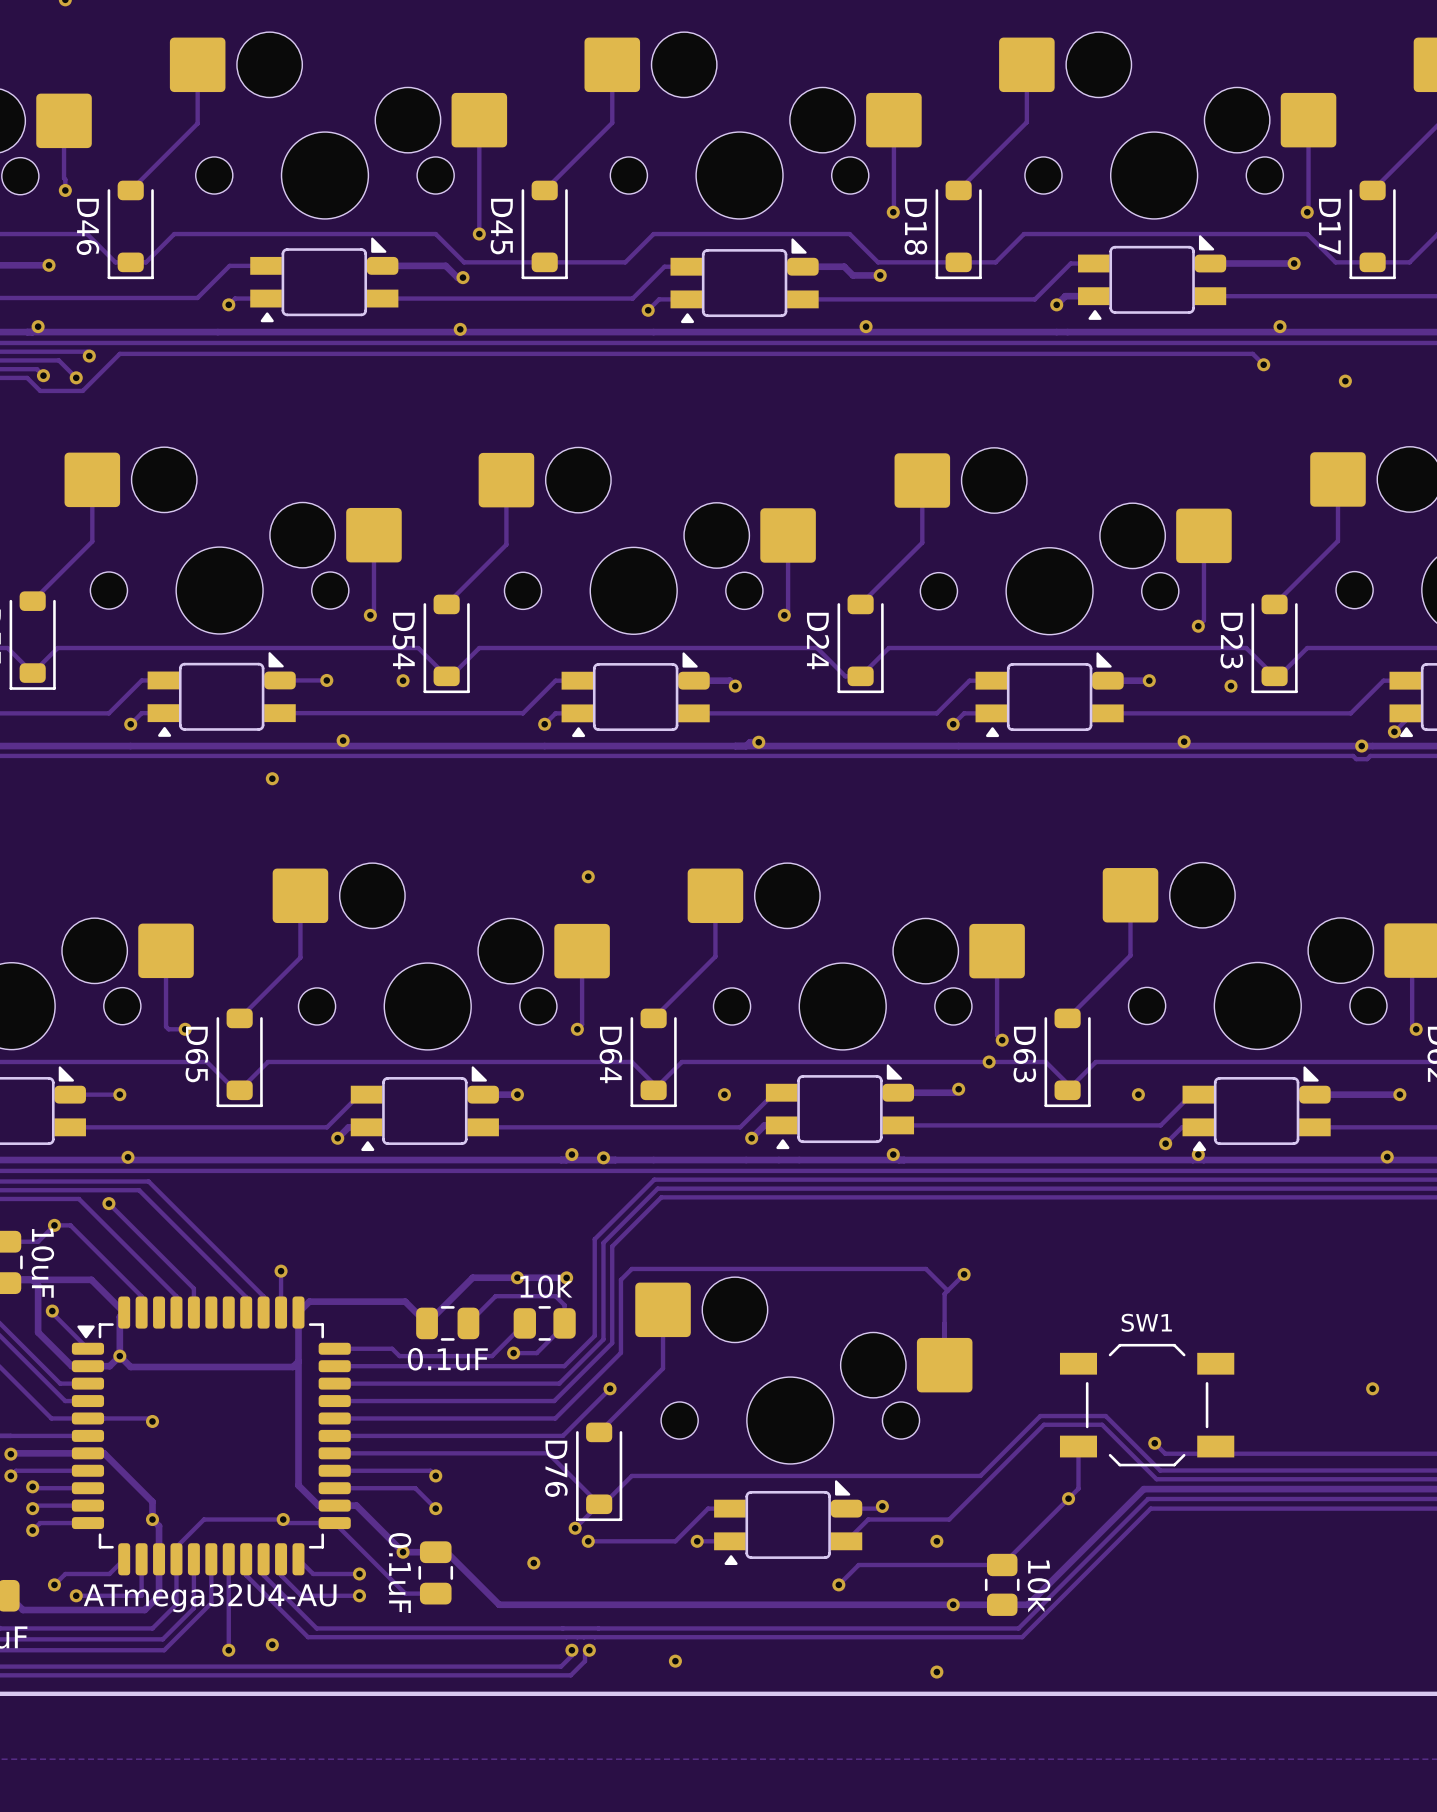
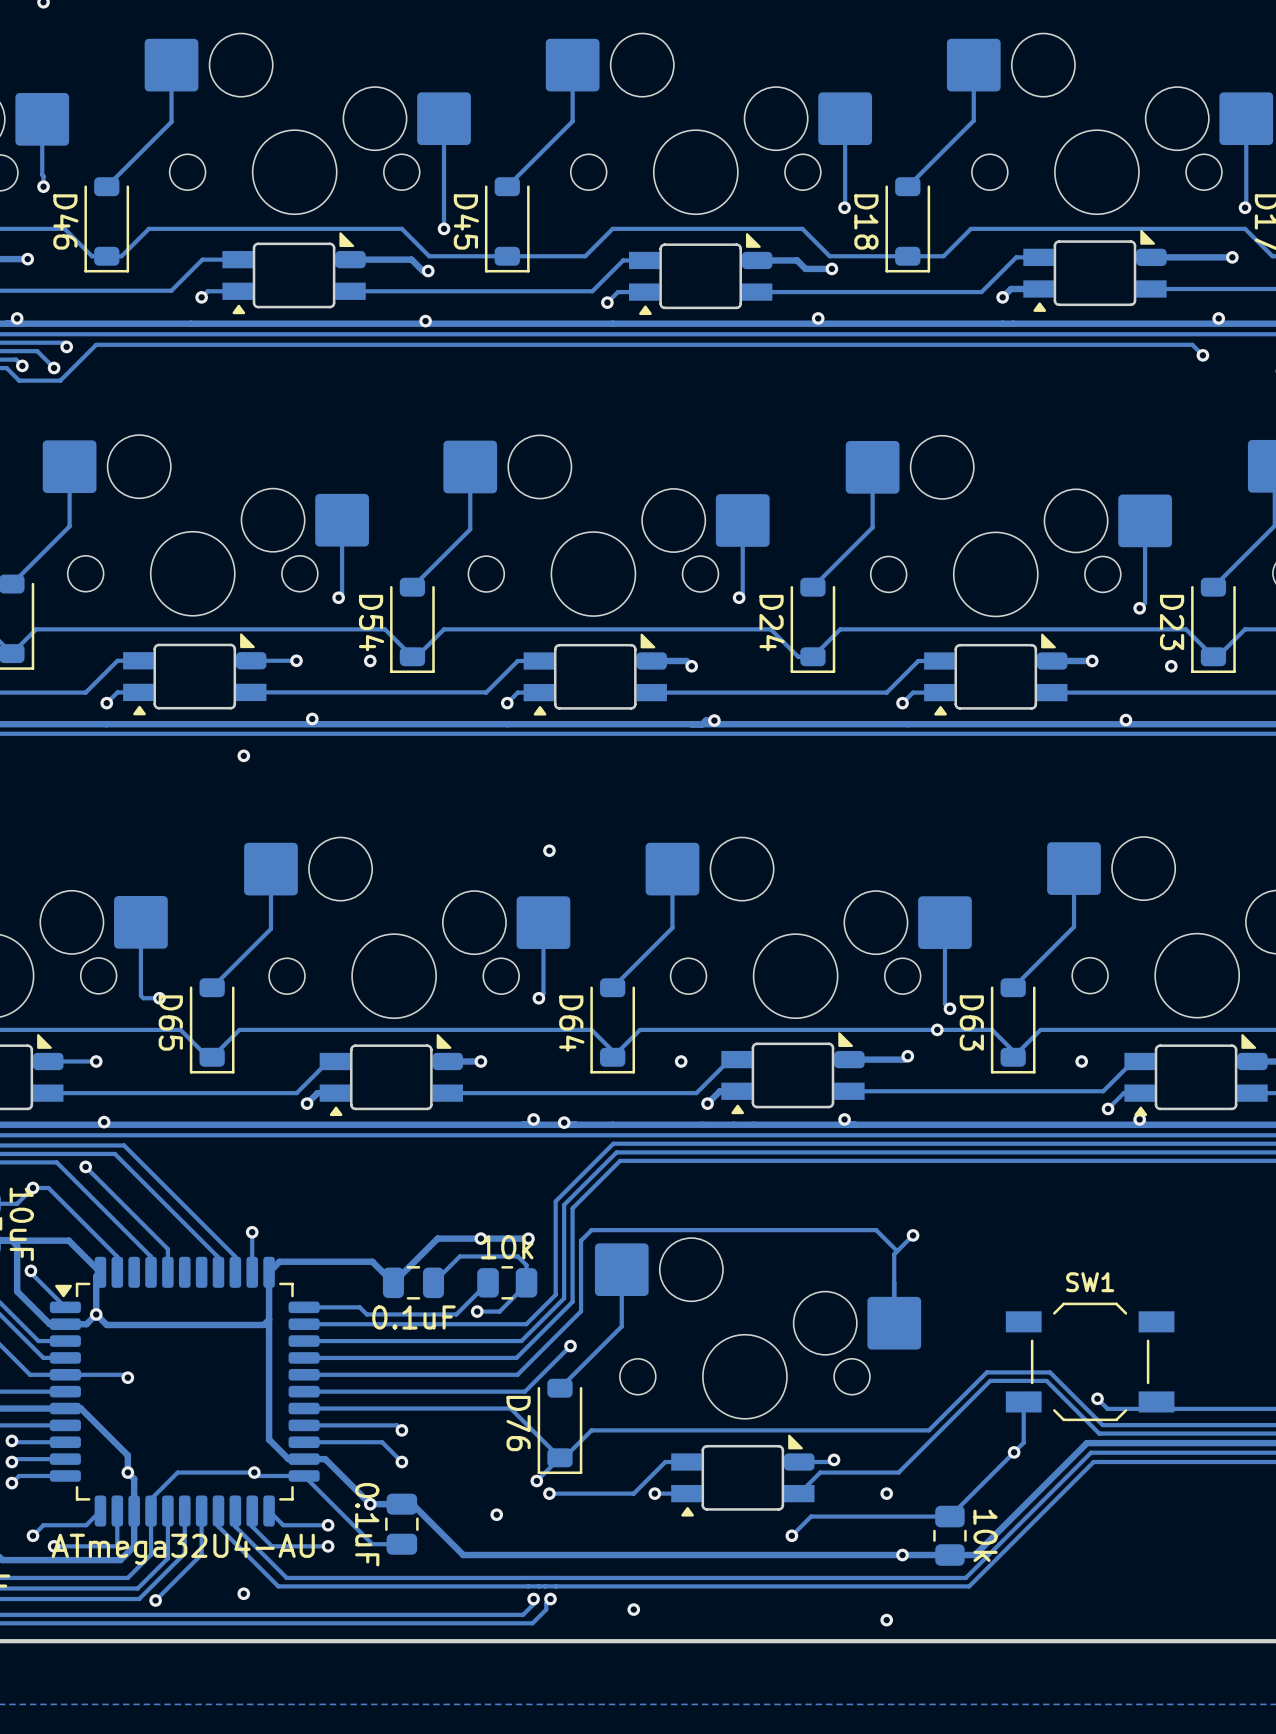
track: (228, 1604) (228, 1650) -> (201, 1554) (155, 1600)
via position: (228, 1650) -> (155, 1600)

